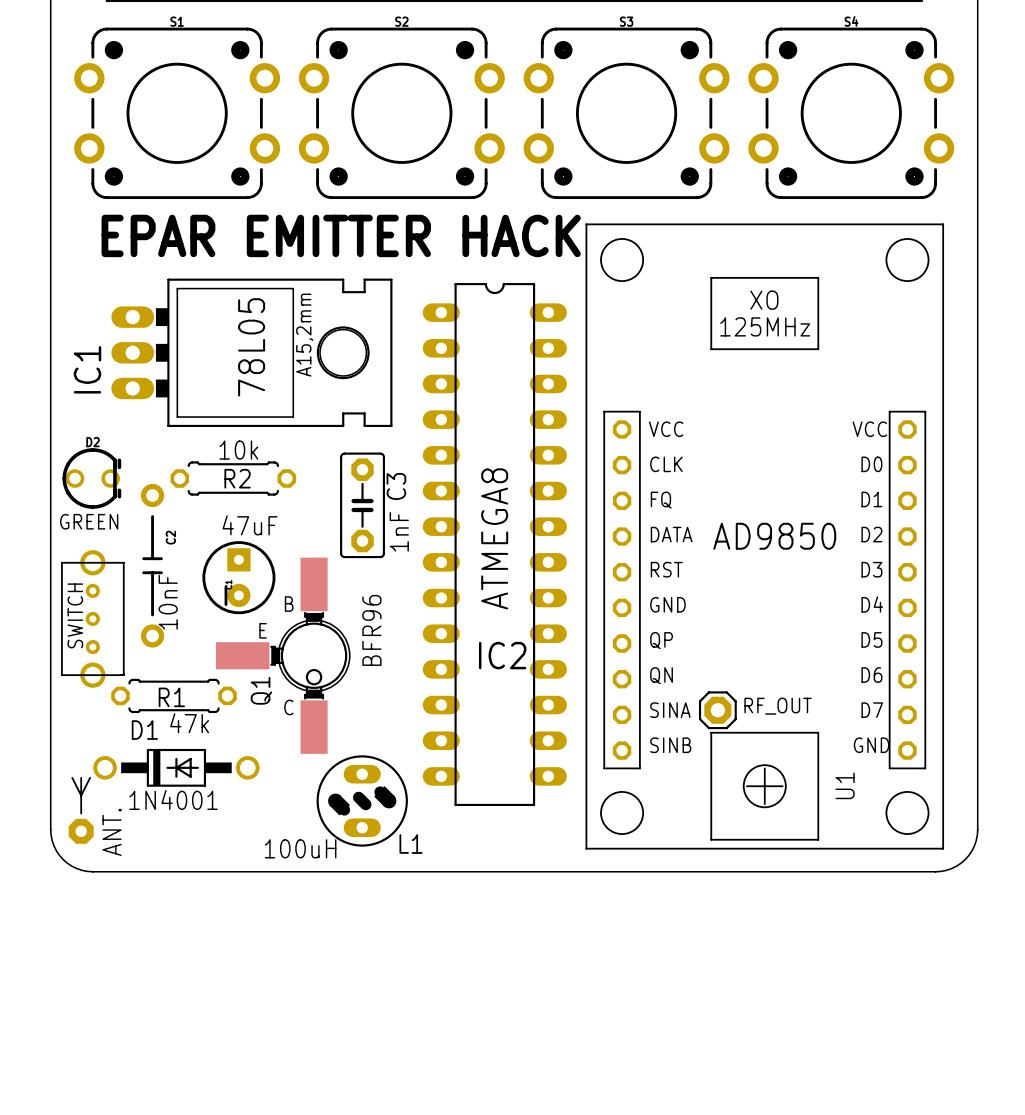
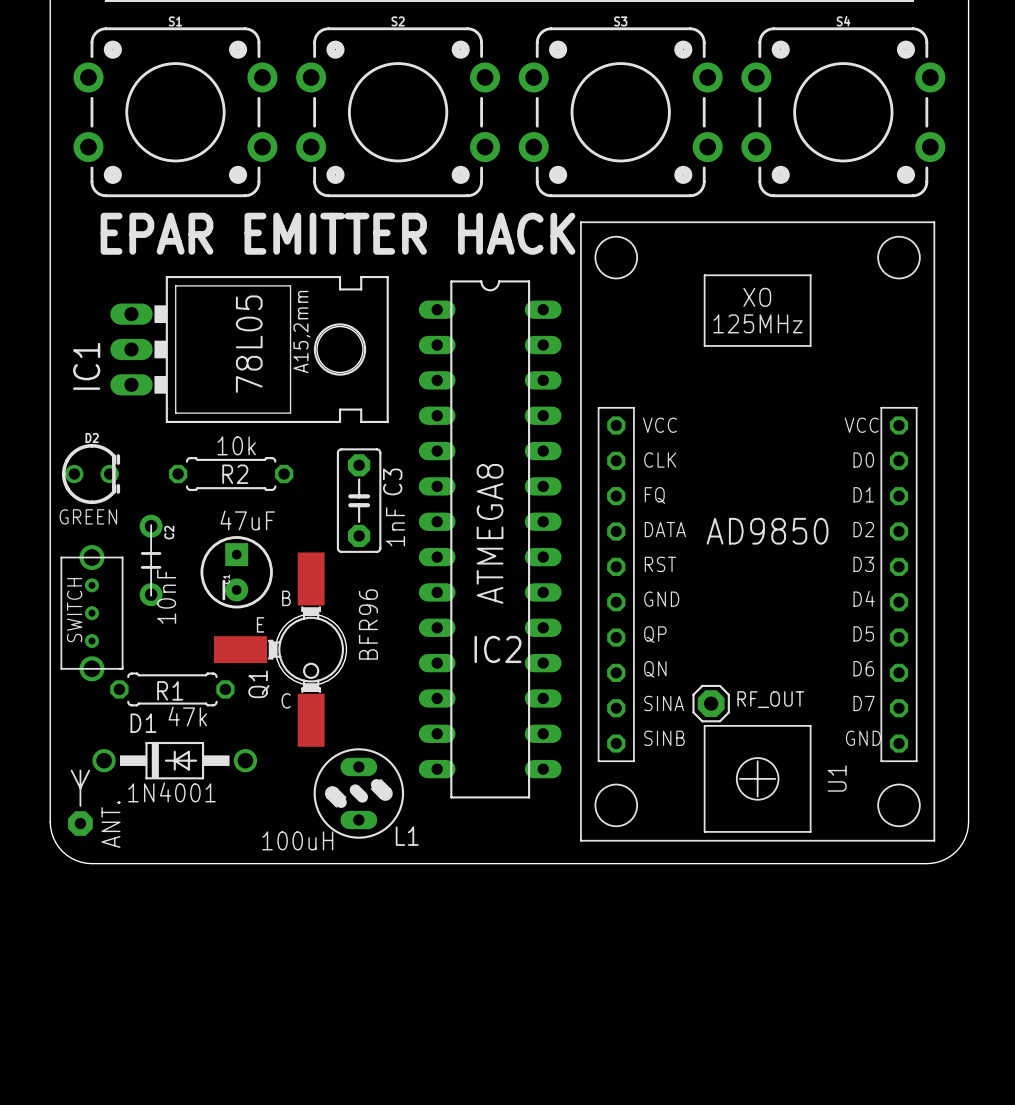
C2 footprint: [140, 483, 165, 648] -> [139, 514, 163, 607]

